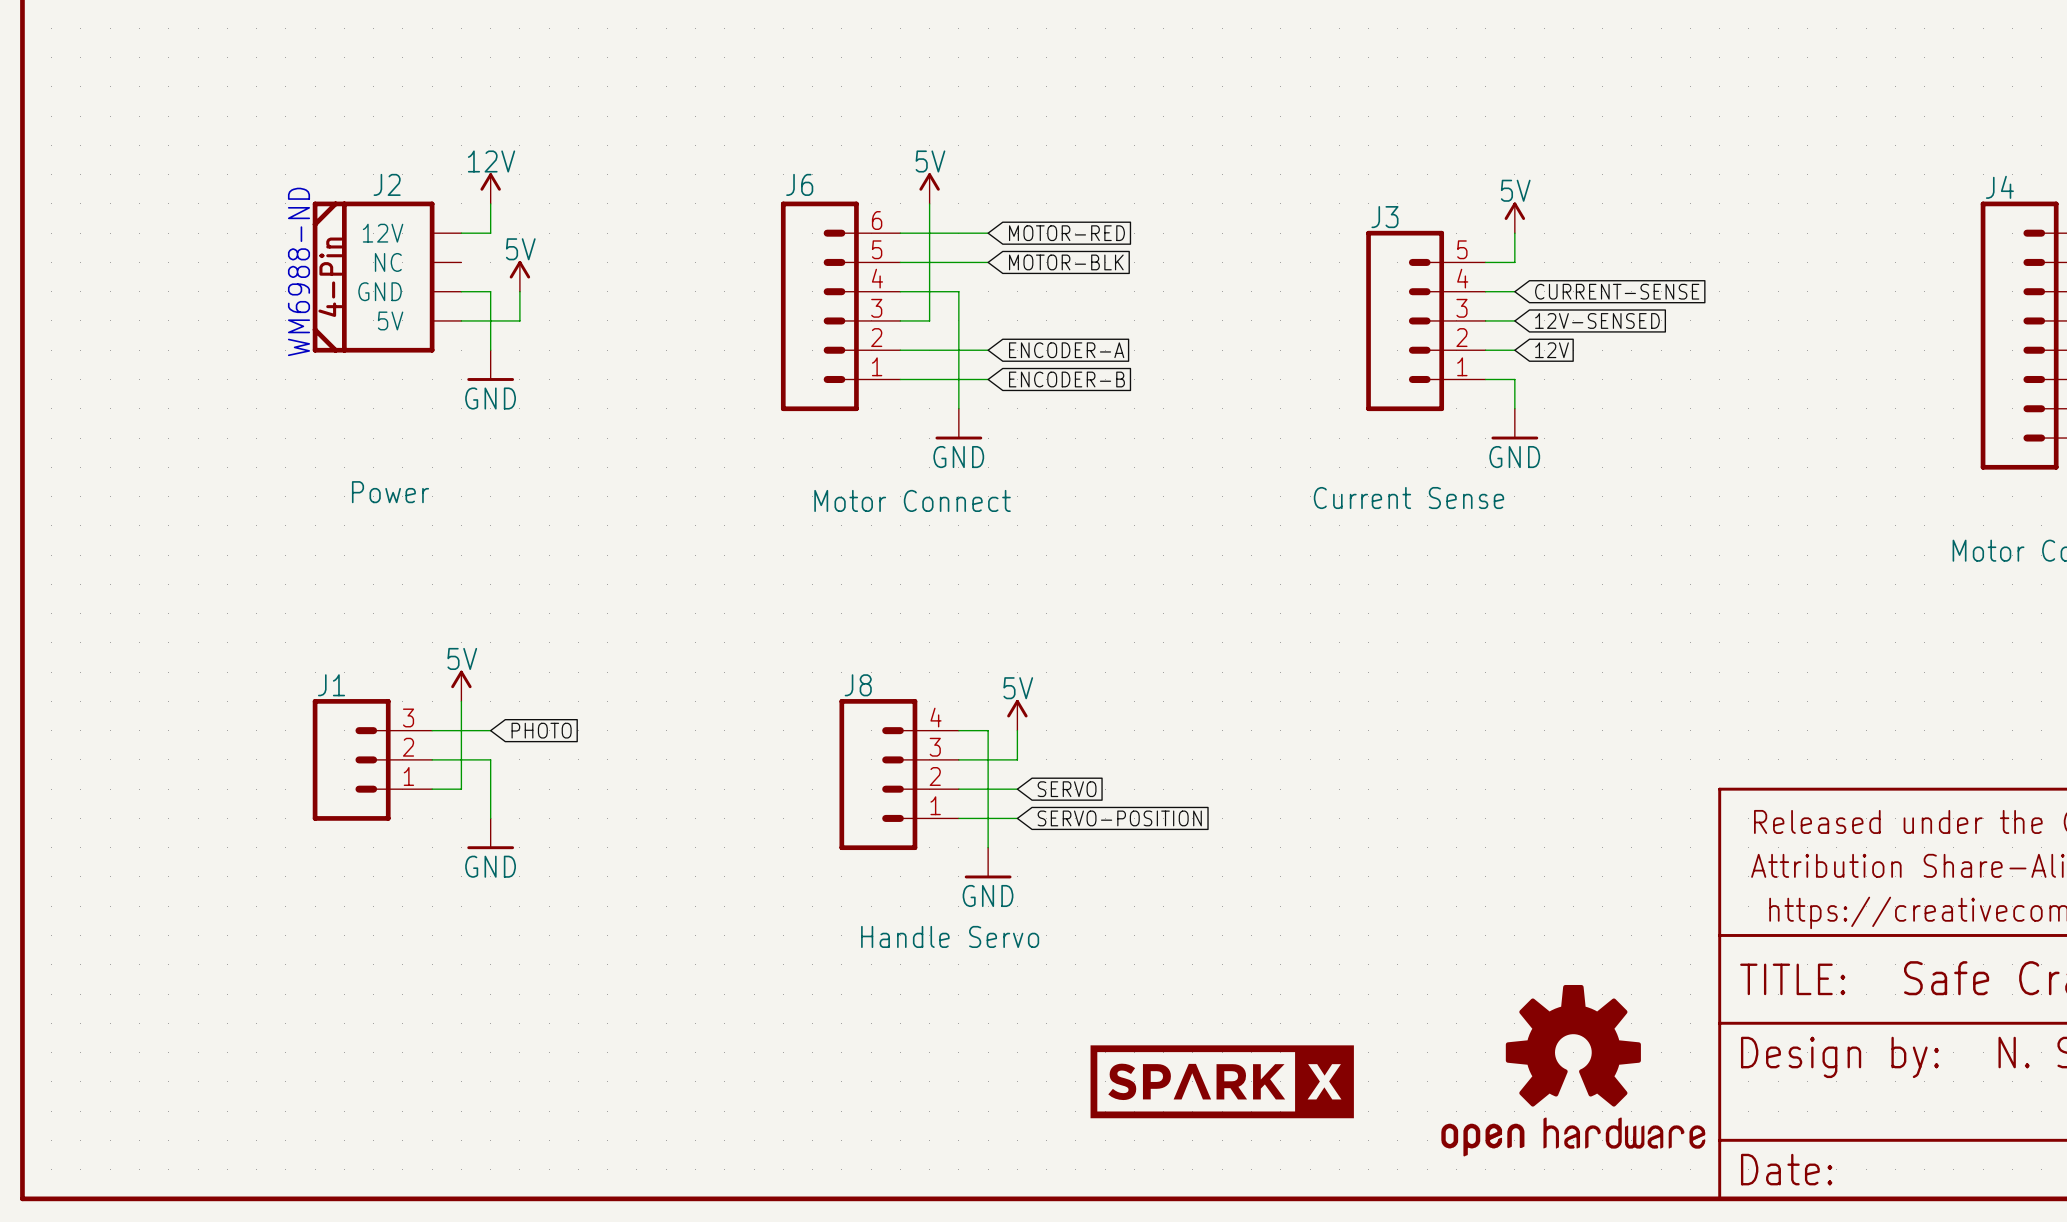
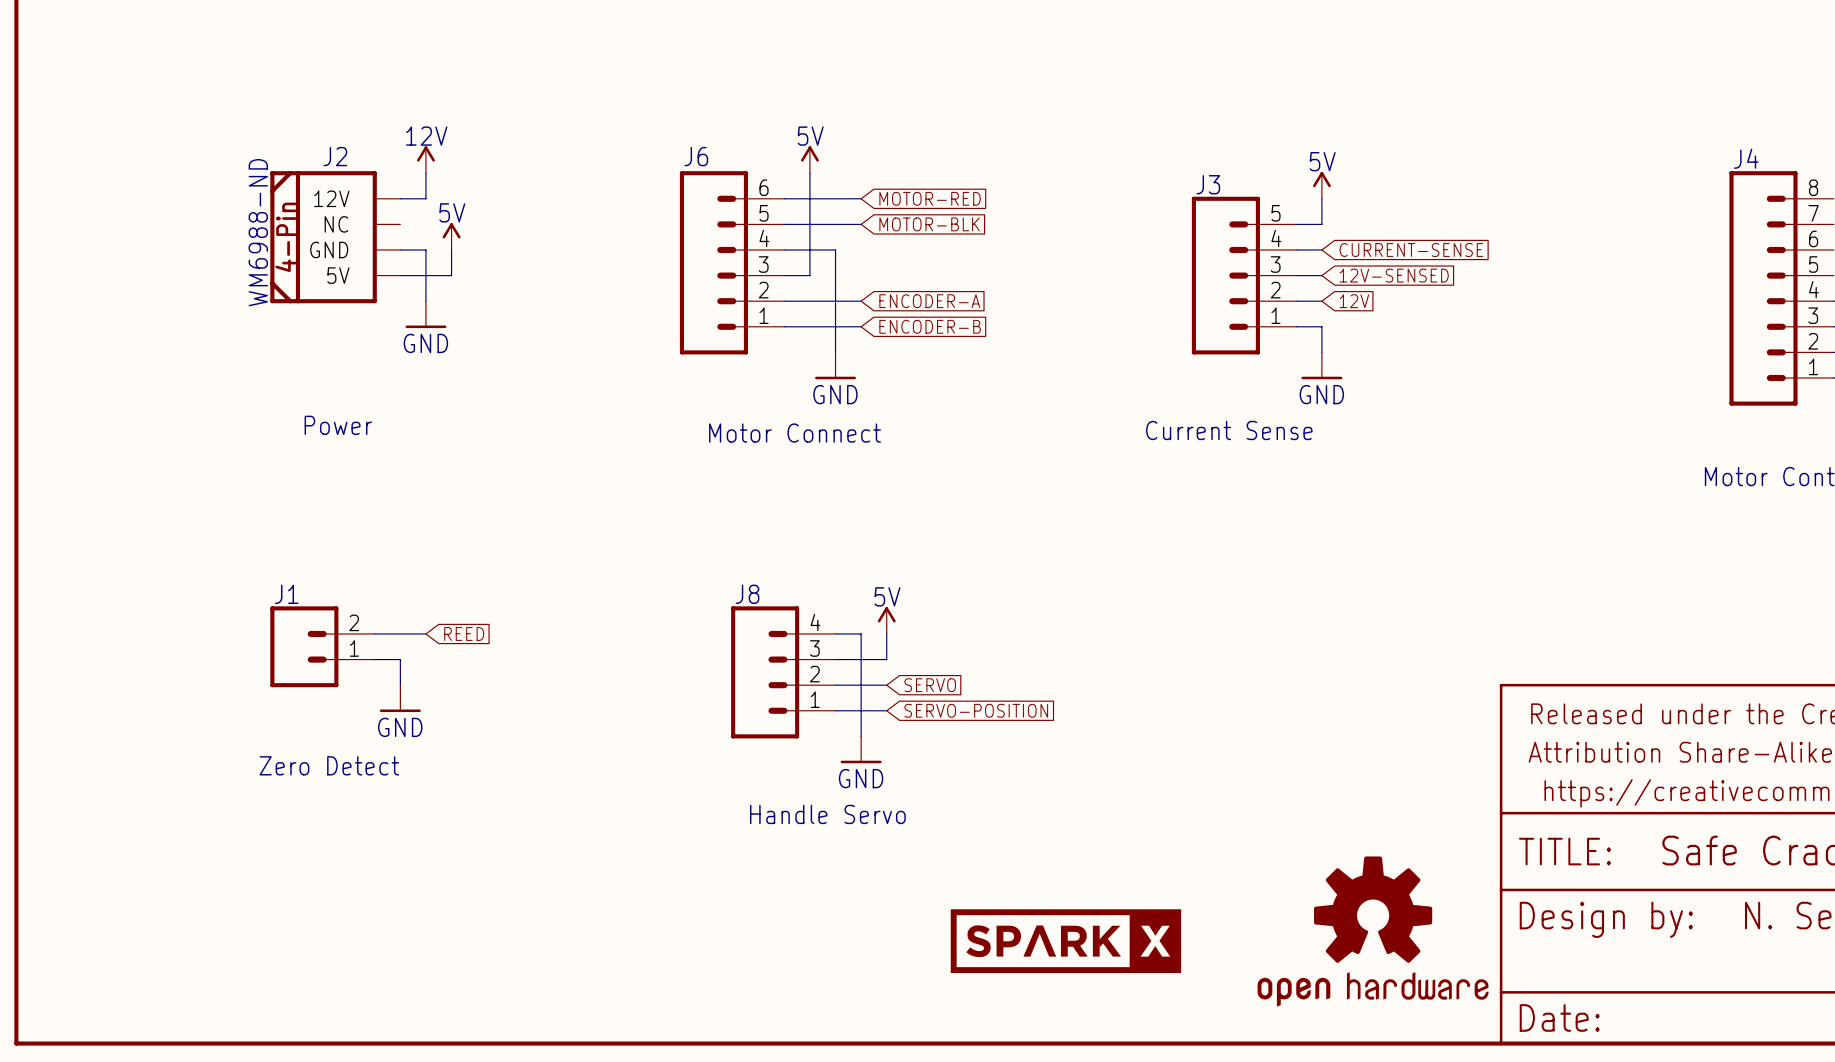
power symbol: 5V (461, 686) -> none
J1 symbol: [312, 699, 433, 821] -> [270, 606, 375, 688]
wire: (461, 701) (461, 759) (490, 759) (490, 818) -> none
global label: PHOTO (541, 730) -> REED (464, 633)
wire: (432, 789) (461, 789) -> none
power symbol position: GND (490, 833) -> GND (400, 698)
J1 value: none -> Zero Detect (329, 765)

